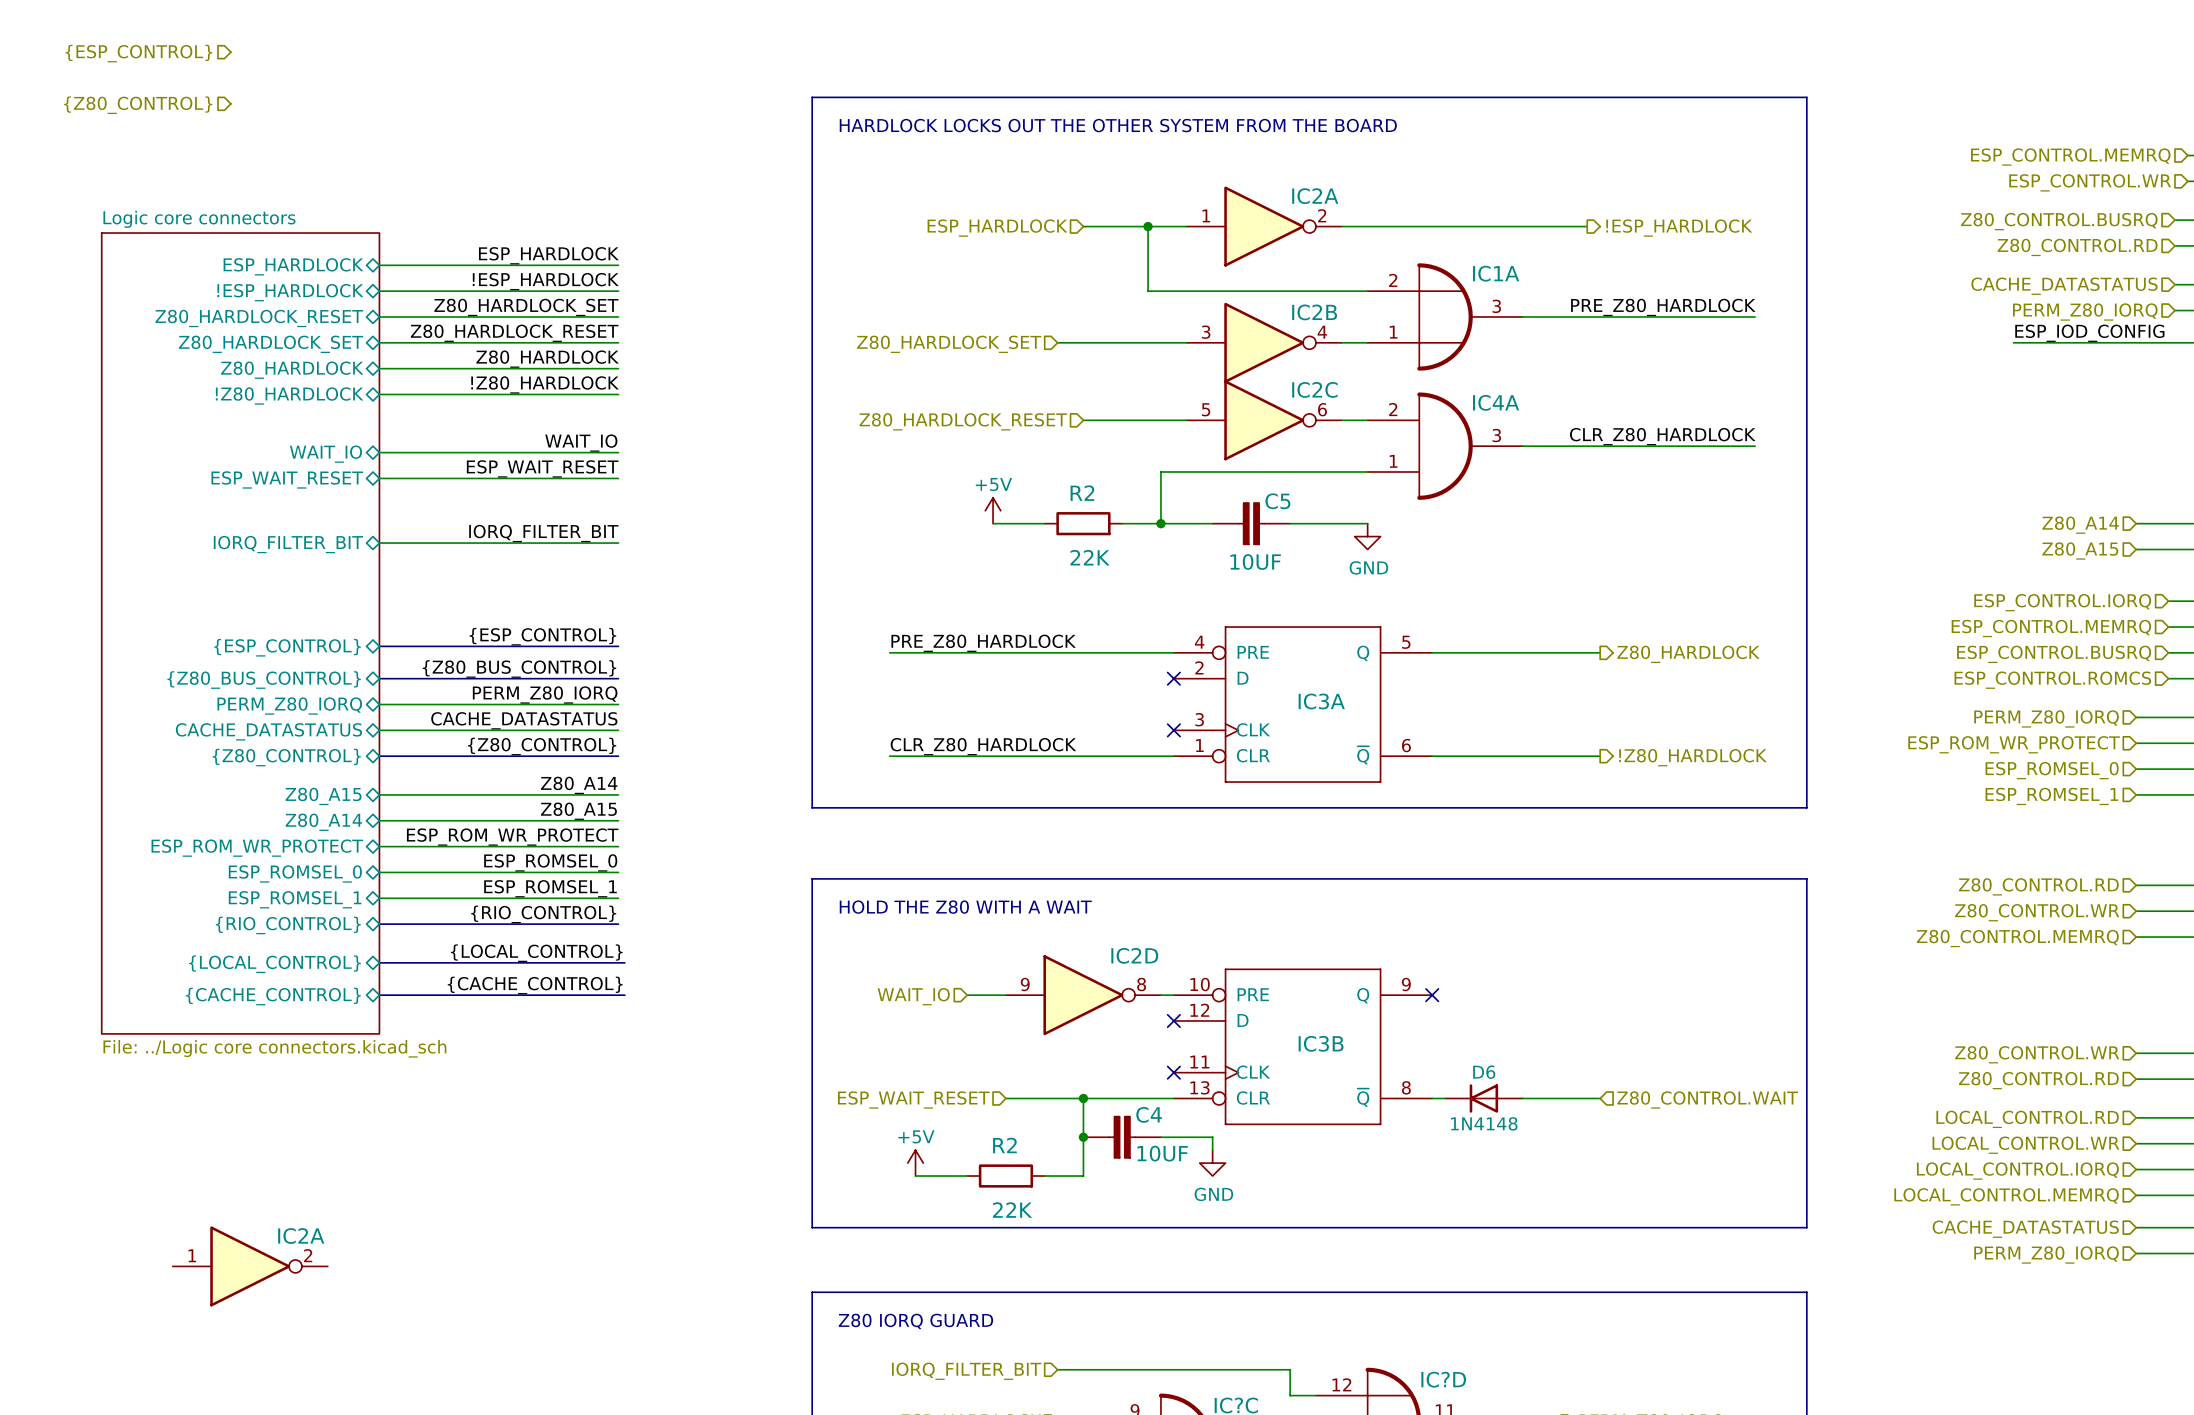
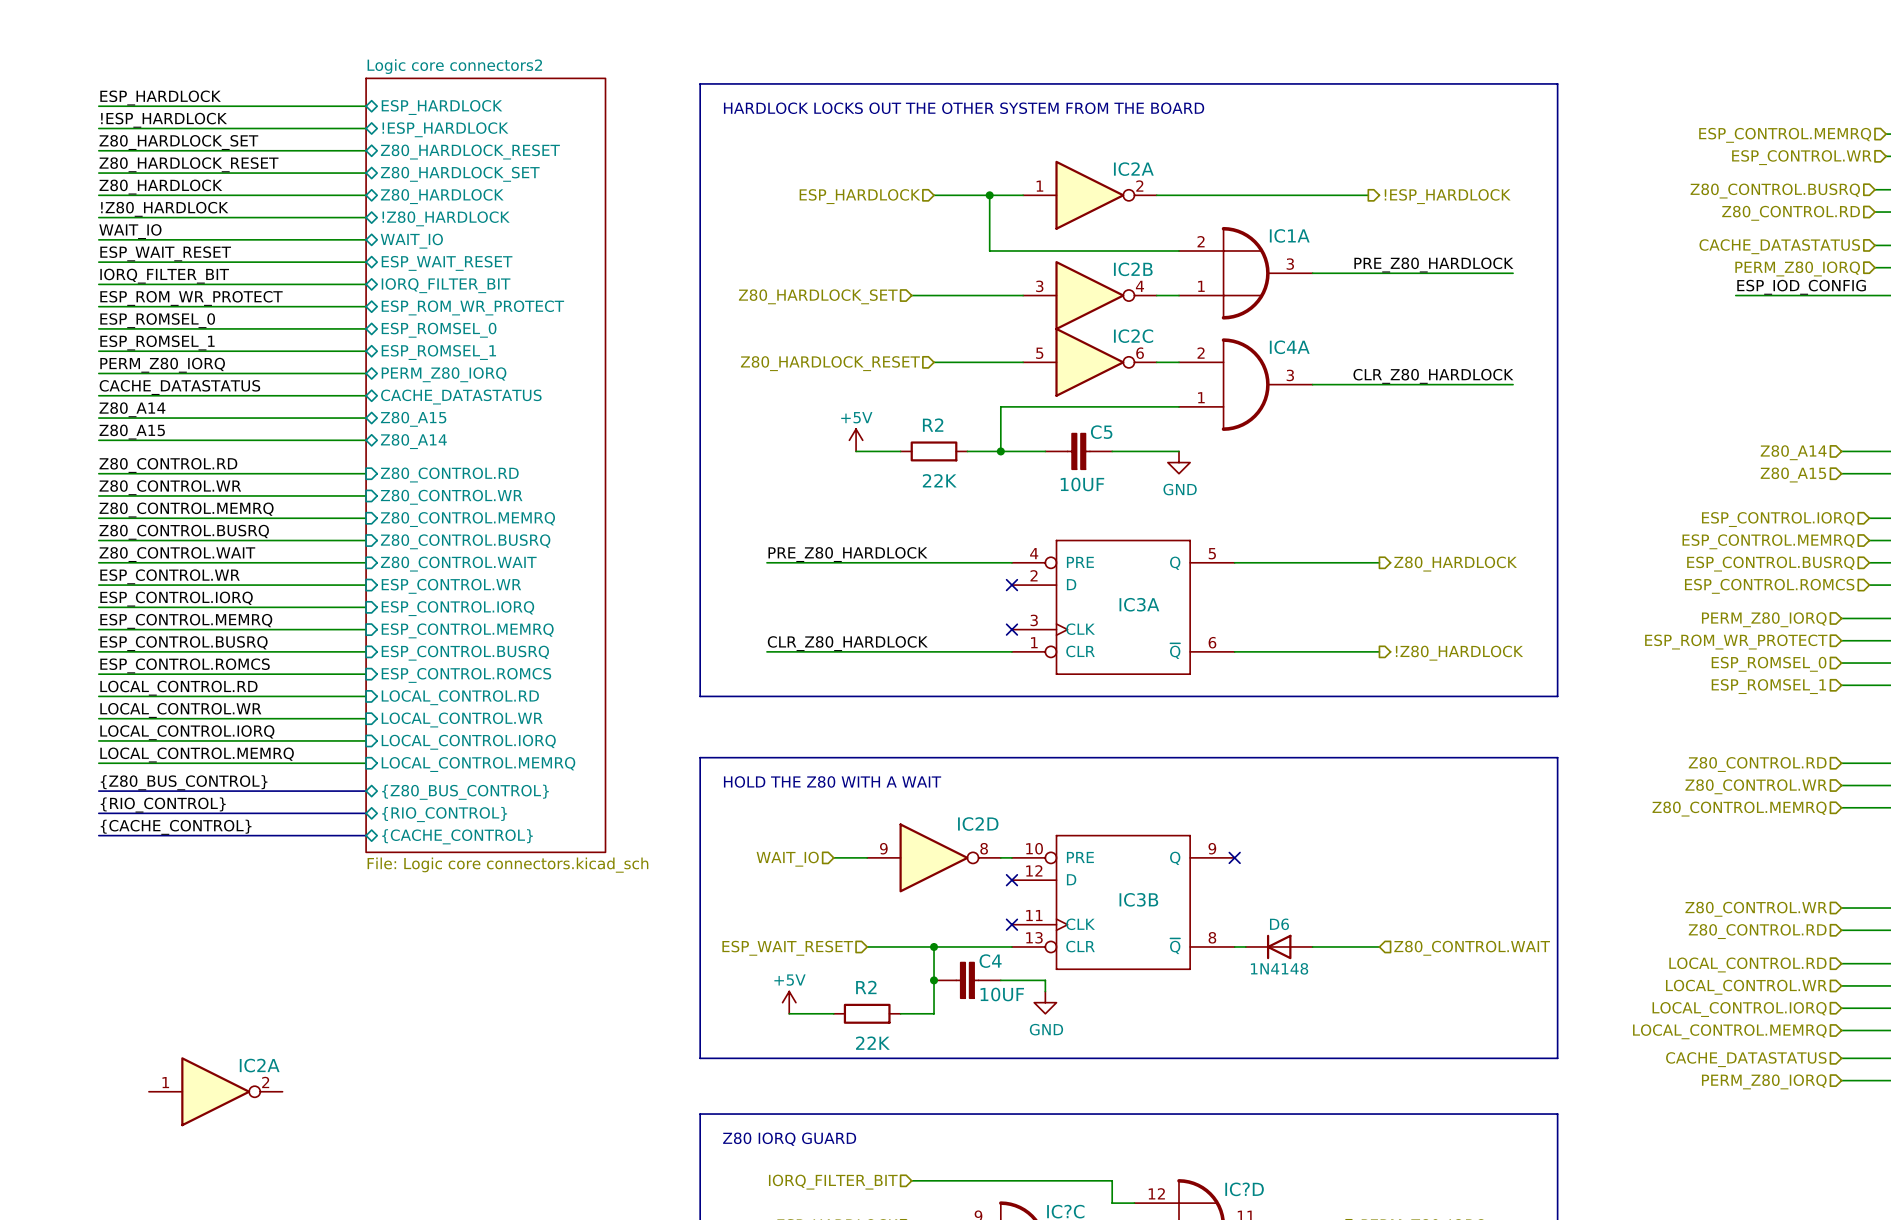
hierarchical label: {ESP_CONTROL} (138, 53) -> none
hierarchical label: {Z80_CONTROL} (138, 105) -> none
label: none -> ESP_HARDLOCK (160, 97)
wire: none -> (98, 106) (366, 106)
label: none -> !ESP_HARDLOCK (164, 120)
wire: none -> (98, 128) (366, 128)
label: none -> Z80_HARDLOCK_SET (178, 142)
wire: none -> (98, 150) (366, 150)
label: none -> Z80_HARDLOCK_RESET (189, 164)
wire: none -> (98, 173) (366, 173)
label: none -> Z80_HARDLOCK (160, 187)
wire: none -> (98, 195) (366, 195)
label: none -> !Z80_HARDLOCK (164, 209)
wire: none -> (98, 217) (366, 217)
label: ESP_HARDLOCK (548, 255) -> none
wire: (379, 265) (618, 265) -> none
sheet pin rotation: 0° (293, 266) -> 180° (441, 107)
sheet pin position: ESP_HARDLOCK (293, 266) -> ESP_HARDLOCK (441, 107)
label: none -> WAIT_IO (130, 231)
wire: none -> (98, 239) (366, 239)
label: !ESP_HARDLOCK (545, 281) -> none
wire: (379, 291) (618, 291) -> none
sheet pin rotation: 0° (290, 292) -> 180° (445, 129)
sheet pin position: !ESP_HARDLOCK (290, 292) -> !ESP_HARDLOCK (445, 129)
label: none -> ESP_WAIT_RESET (165, 253)
wire: none -> (98, 262) (366, 262)
label: Z80_HARDLOCK_SET (526, 307) -> none
wire: (379, 316) (618, 316) -> none
sheet pin rotation: 0° (259, 318) -> 180° (470, 152)
sheet pin position: Z80_HARDLOCK_RESET (259, 318) -> Z80_HARDLOCK_RESET (470, 152)
label: none -> IORQ_FILTER_BIT (164, 276)
wire: none -> (98, 284) (366, 284)
label: Z80_HARDLOCK_RESET (514, 333) -> none
wire: (379, 342) (618, 342) -> none
sheet pin rotation: 0° (271, 344) -> 180° (460, 174)
sheet pin position: Z80_HARDLOCK_SET (271, 344) -> Z80_HARDLOCK_SET (460, 174)
label: none -> ESP_ROM_WR_PROTECT (191, 298)
wire: none -> (98, 306) (366, 306)
sheet pin: none -> ESP_ROM_WR_PROTECT (472, 307)
label: Z80_HARDLOCK (547, 359) -> none
wire: (379, 368) (618, 368) -> none
sheet pin rotation: 0° (292, 370) -> 180° (442, 196)
sheet pin position: Z80_HARDLOCK (292, 370) -> Z80_HARDLOCK (442, 196)
label: none -> ESP_ROMSEL_0 (157, 320)
wire: none -> (98, 328) (366, 328)
sheet pin: none -> ESP_ROMSEL_0 (439, 330)
label: !Z80_HARDLOCK (545, 384) -> none
wire: (379, 394) (618, 394) -> none
sheet pin rotation: 0° (289, 395) -> 180° (446, 218)
sheet pin position: !Z80_HARDLOCK (289, 395) -> !Z80_HARDLOCK (446, 218)
label: none -> ESP_ROMSEL_1 (157, 342)
wire: none -> (98, 351) (366, 351)
sheet pin: none -> ESP_ROMSEL_1 (438, 352)
label: none -> PERM_Z80_IORQ (162, 365)
wire: none -> (98, 373) (366, 373)
sheet pin: none -> PERM_Z80_IORQ (444, 374)
label: WAIT_IO (581, 443) -> none
label: none -> CACHE_DATASTATUS (179, 387)
wire: (379, 452) (618, 452) -> none
sheet pin rotation: 0° (325, 454) -> 180° (411, 241)
sheet pin position: WAIT_IO (325, 454) -> WAIT_IO (411, 241)
wire: none -> (98, 395) (366, 395)
sheet pin: none -> CACHE_DATASTATUS (461, 397)
label: ESP_WAIT_RESET (542, 468) -> none
label: none -> Z80_A14 (132, 409)
wire: (379, 478) (618, 478) -> none
sheet pin rotation: 0° (287, 479) -> 180° (447, 263)
sheet pin position: ESP_WAIT_RESET (287, 479) -> ESP_WAIT_RESET (447, 263)
wire: none -> (98, 418) (366, 418)
sheet pin: none -> Z80_A15 (413, 419)
label: none -> Z80_A15 (132, 432)
wire: none -> (98, 440) (366, 440)
sheet pin: none -> Z80_A14 (413, 441)
label: IORQ_FILTER_BIT (543, 533) -> none
label: none -> Z80_CONTROL.RD (168, 465)
sheet Logic core connectors2: none -> File: Logic core connectors.kicad_sch (485, 465)
wire: (379, 543) (618, 543) -> none
sheet pin rotation: 0° (288, 544) -> 180° (446, 285)
sheet pin position: IORQ_FILTER_BIT (288, 544) -> IORQ_FILTER_BIT (446, 285)
wire: none -> (98, 473) (366, 473)
sheet pin: none -> Z80_CONTROL.RD (449, 474)
label: none -> Z80_CONTROL.WR (170, 487)
wire: none -> (98, 495) (366, 495)
sheet pin: none -> Z80_CONTROL.WR (451, 497)
label: none -> Z80_CONTROL.MEMRQ (186, 510)
wire: none -> (98, 518) (366, 518)
sheet pin: none -> Z80_CONTROL.MEMRQ (467, 519)
label: none -> Z80_CONTROL.BUSRQ (184, 532)
wire: none -> (98, 540) (366, 540)
sheet pin: none -> Z80_CONTROL.BUSRQ (465, 541)
sheet Logic core connectors: File: ../Logic core connectors.kicad_sch (240, 633) -> none
label: {ESP_CONTROL} (542, 636) -> none
label: none -> Z80_CONTROL.WAIT (177, 554)
bus: (379, 646) (618, 646) -> none
sheet pin: {ESP_CONTROL} (287, 647) -> none
wire: none -> (98, 562) (366, 562)
sheet pin: none -> Z80_CONTROL.WAIT (458, 564)
label: {Z80_BUS_CONTROL} (519, 668) -> none
label: none -> ESP_CONTROL.WR (170, 576)
wire: none -> (98, 585) (366, 585)
bus: (379, 678) (618, 678) -> none
sheet pin rotation: 0° (264, 680) -> 180° (465, 792)
sheet pin position: {Z80_BUS_CONTROL} (264, 680) -> {Z80_BUS_CONTROL} (465, 792)
sheet pin: none -> ESP_CONTROL.WR (451, 586)
label: none -> ESP_CONTROL.IORQ (176, 599)
label: PERM_Z80_IORQ (545, 694) -> none
wire: none -> (98, 607) (327, 607)
wire: (424, 704) (618, 704) -> none
sheet pin: PERM_Z80_IORQ (289, 706) -> none
sheet pin: none -> ESP_CONTROL.IORQ (457, 608)
label: none -> ESP_CONTROL.MEMRQ (186, 621)
label: CACHE_DATASTATUS (524, 720) -> none
wire: none -> (98, 629) (327, 629)
wire: (424, 730) (618, 730) -> none
sheet pin: CACHE_DATASTATUS (268, 731) -> none
sheet pin: none -> ESP_CONTROL.MEMRQ (467, 630)
label: none -> ESP_CONTROL.BUSRQ (183, 643)
label: {Z80_CONTROL} (542, 746) -> none
wire: none -> (98, 651) (366, 651)
bus: (379, 756) (618, 756) -> none
sheet pin: {Z80_CONTROL} (286, 757) -> none
sheet pin: none -> ESP_CONTROL.BUSRQ (465, 653)
label: none -> ESP_CONTROL.ROMCS (185, 665)
wire: none -> (98, 674) (366, 674)
sheet pin: none -> ESP_CONTROL.ROMCS (466, 675)
label: Z80_A14 (579, 785) -> none
wire: (379, 794) (618, 794) -> none
sheet pin: Z80_A15 (323, 796) -> none
label: none -> LOCAL_CONTROL.RD (178, 688)
wire: none -> (98, 696) (366, 696)
sheet pin: none -> LOCAL_CONTROL.RD (460, 697)
label: Z80_A15 (578, 811) -> none
wire: (379, 820) (618, 820) -> none
sheet pin: Z80_A14 (323, 822) -> none
label: none -> LOCAL_CONTROL.WR (180, 710)
wire: none -> (98, 718) (366, 718)
sheet pin: none -> LOCAL_CONTROL.WR (462, 719)
label: ESP_ROM_WR_PROTECT (512, 837) -> none
wire: (379, 846) (618, 846) -> none
sheet pin: ESP_ROM_WR_PROTECT (257, 848) -> none
label: none -> LOCAL_CONTROL.IORQ (187, 732)
wire: none -> (98, 740) (366, 740)
sheet pin: none -> LOCAL_CONTROL.IORQ (468, 742)
label: ESP_ROMSEL_0 (550, 862) -> none
wire: (379, 872) (618, 872) -> none
sheet pin: ESP_ROMSEL_0 (295, 873) -> none
label: none -> LOCAL_CONTROL.MEMRQ (197, 755)
wire: none -> (98, 763) (366, 763)
sheet pin: none -> LOCAL_CONTROL.MEMRQ (478, 764)
label: ESP_ROMSEL_1 (550, 888) -> none
wire: (379, 898) (618, 898) -> none
sheet pin: ESP_ROMSEL_1 (295, 899) -> none
label: none -> {Z80_BUS_CONTROL} (184, 782)
label: {RIO_CONTROL} (543, 914) -> none
bus: none -> (98, 791) (366, 791)
bus: (379, 924) (618, 924) -> none
sheet pin rotation: 0° (288, 925) -> 180° (444, 814)
sheet pin position: {RIO_CONTROL} (288, 925) -> {RIO_CONTROL} (444, 814)
label: none -> {RIO_CONTROL} (163, 804)
bus: none -> (98, 813) (366, 813)
label: {LOCAL_CONTROL} (536, 953) -> none
label: none -> {CACHE_CONTROL} (176, 827)
bus: (379, 962) (624, 962) -> none
sheet pin: {LOCAL_CONTROL} (274, 964) -> none
bus: none -> (98, 835) (366, 835)
label: {CACHE_CONTROL} (535, 985) -> none
bus: (379, 995) (624, 995) -> none
sheet pin rotation: 0° (273, 996) -> 180° (457, 836)
sheet pin position: {CACHE_CONTROL} (273, 996) -> {CACHE_CONTROL} (457, 836)

